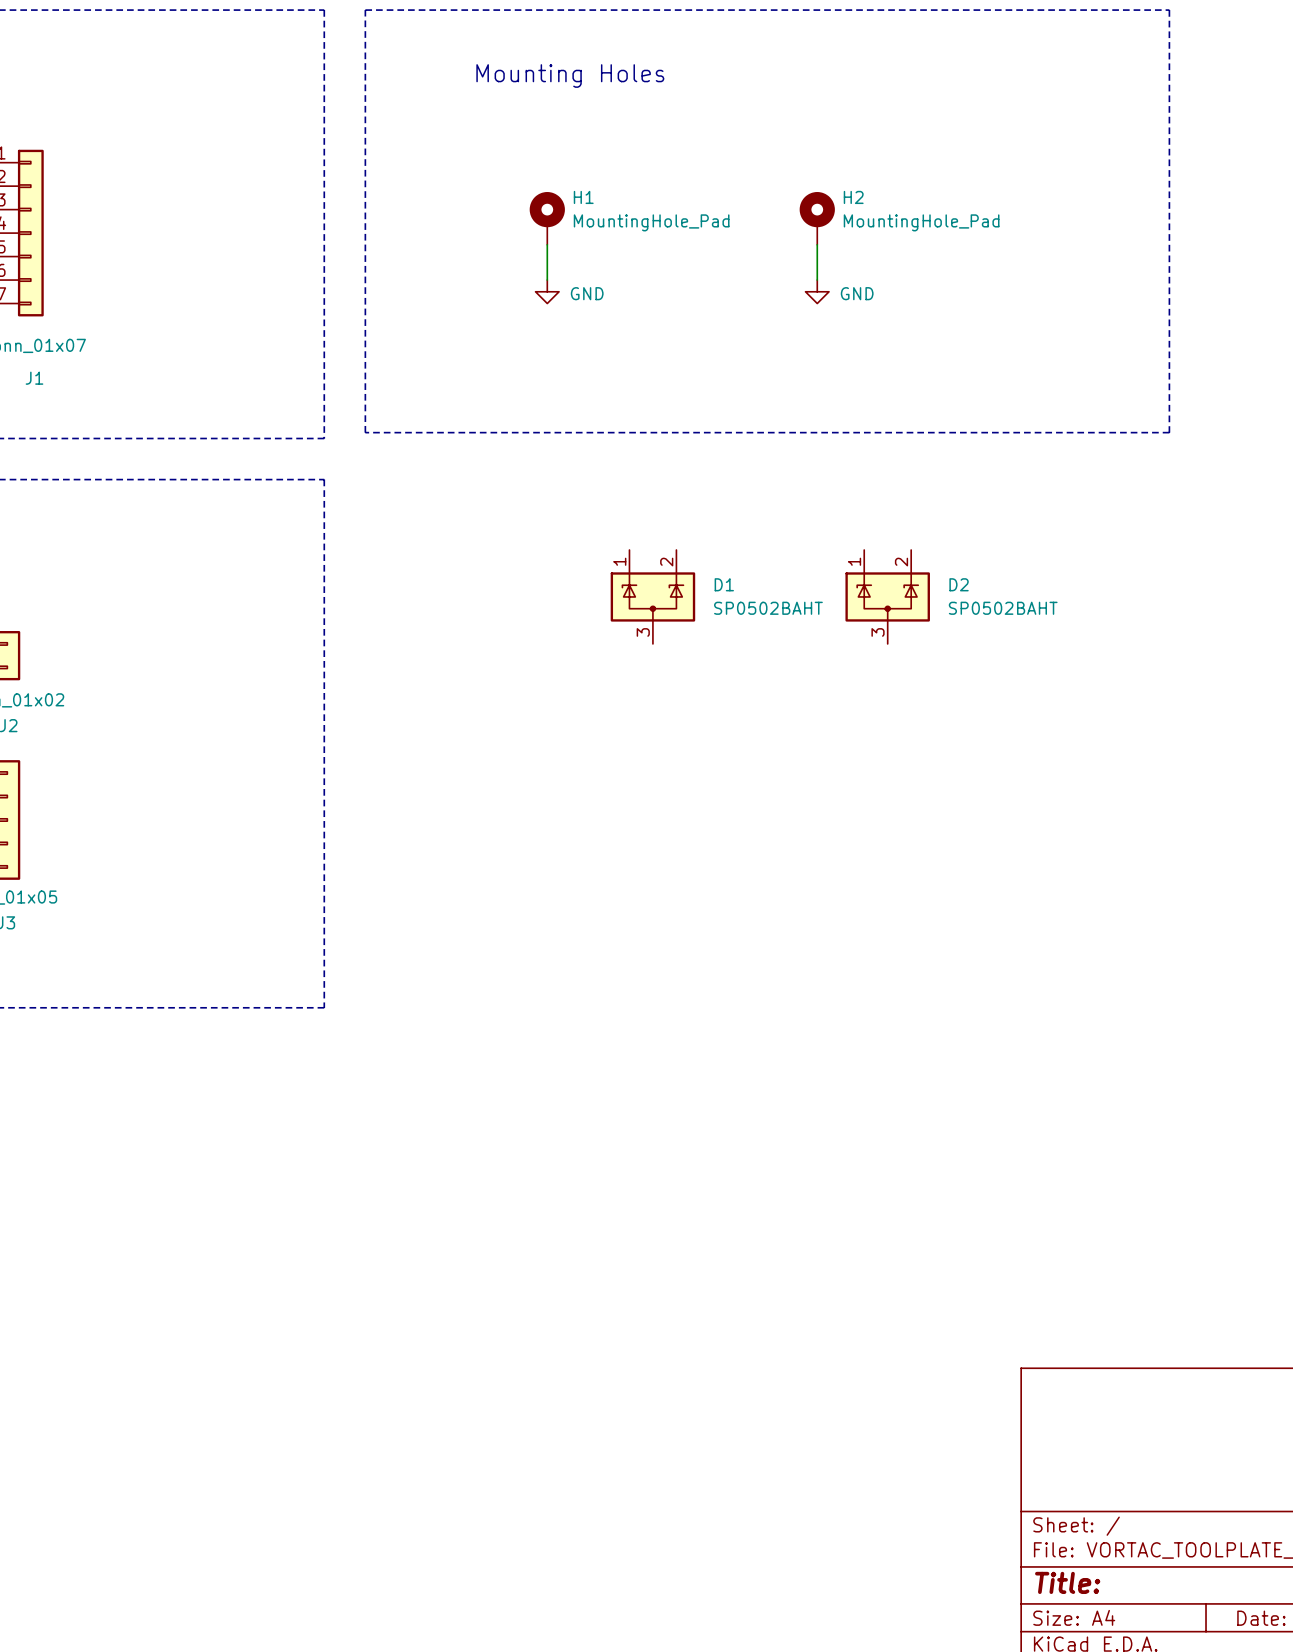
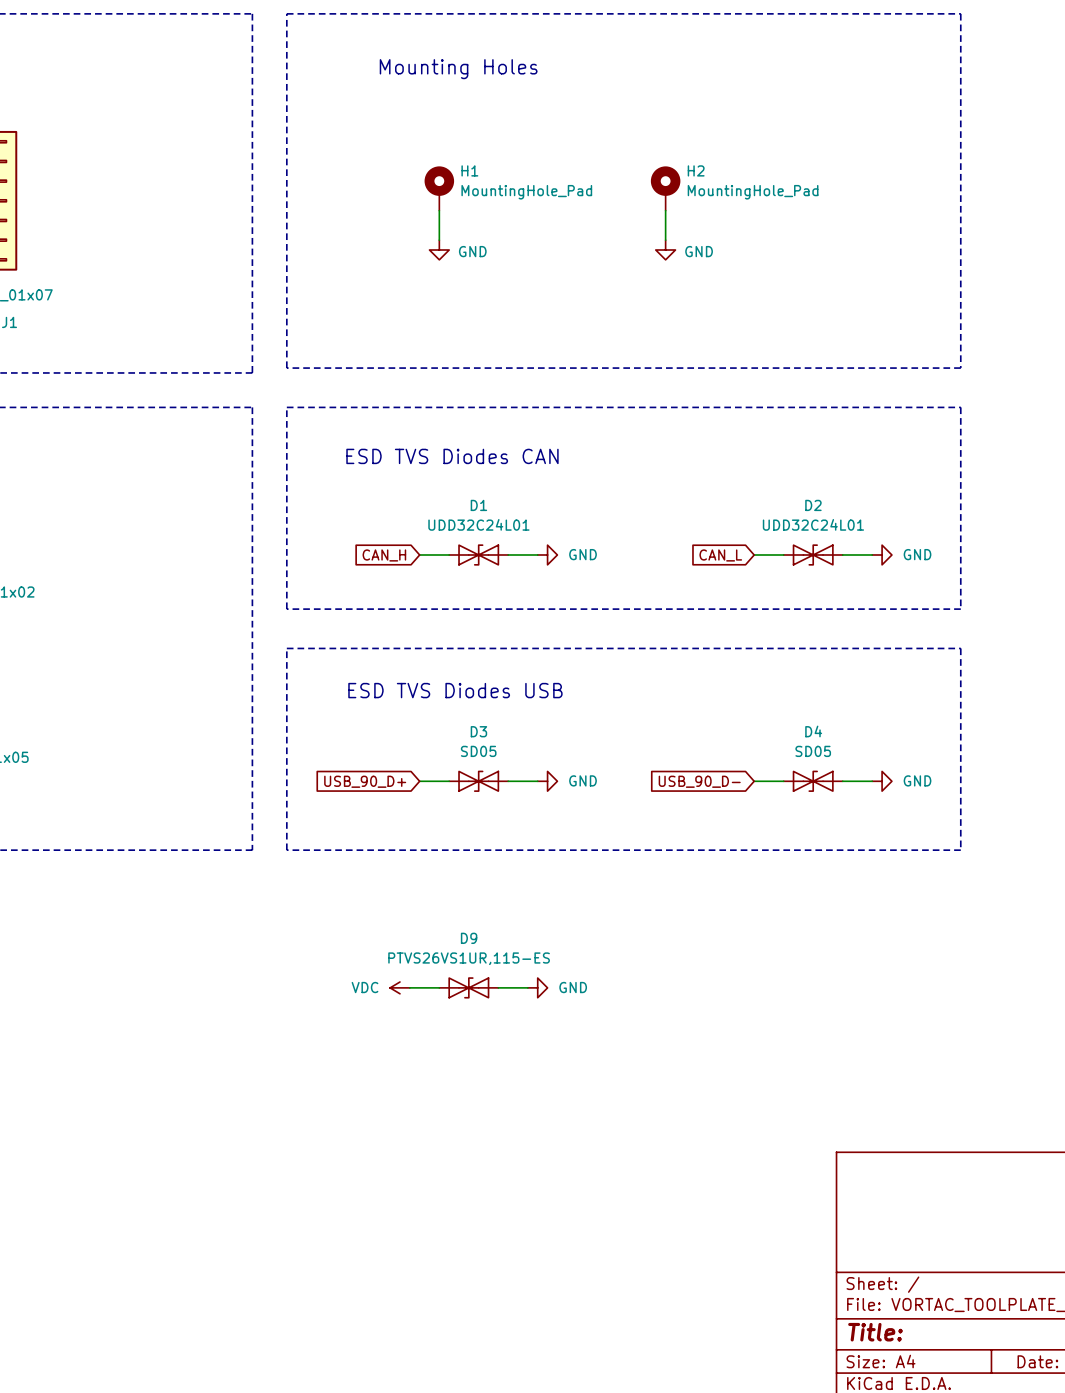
line: none -> (286, 407) (286, 609) (960, 609) (960, 407) (286, 407)
text: none -> ESD TVS Diodes CAN (452, 456)
D1 symbol: [610, 550, 696, 644] -> [449, 544, 509, 566]
D2 symbol: [845, 550, 930, 644] -> [783, 544, 843, 566]
D1 name position: D1 (724, 584) -> D1 (478, 505)
D2 name position: D2 (959, 584) -> D2 (813, 505)
D1 value: SP0502BAHT (768, 608) -> UDD32C24L01 (478, 524)
D2 value: SP0502BAHT (1003, 608) -> UDD32C24L01 (813, 524)
wire: none -> (419, 554) (449, 554)
wire: none -> (508, 554) (537, 554)
power symbol: none -> GND (547, 554)
wire: none -> (754, 554) (783, 554)
wire: none -> (842, 554) (872, 554)
power symbol: none -> GND (882, 554)
global label: none -> CAN_H (384, 555)
global label: none -> CAN_L (720, 555)
line: none -> (286, 648) (960, 648) (960, 850) (286, 850) (286, 648)
text: none -> ESD TVS Diodes USB (455, 690)
wire: none -> (419, 781) (449, 781)
D3: none -> SD05 (478, 781)
wire: none -> (508, 781) (537, 781)
power symbol: none -> GND (547, 781)
wire: none -> (754, 781) (783, 781)
D4: none -> SD05 (813, 781)
wire: none -> (842, 781) (872, 781)
power symbol: none -> GND (882, 781)
global label: none -> USB_90_D+ (365, 781)
global label: none -> USB_90_D- (699, 781)
power symbol: none -> VDC (399, 987)
wire: none -> (409, 987) (439, 987)
D9: none -> PTVS26VS1UR,115-ES (468, 987)
wire: none -> (498, 987) (527, 987)
power symbol: none -> GND (537, 987)

